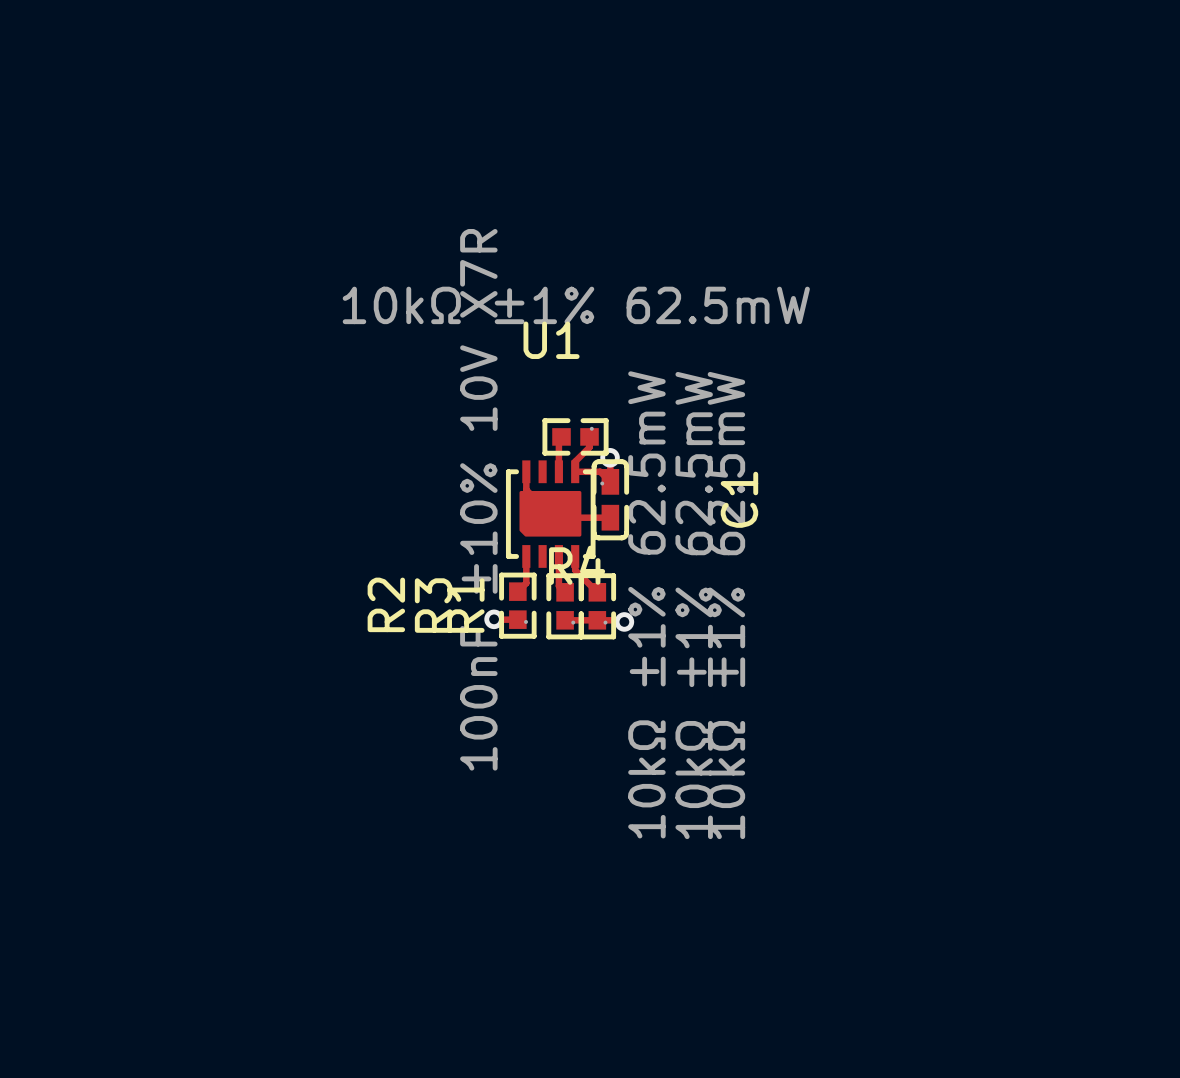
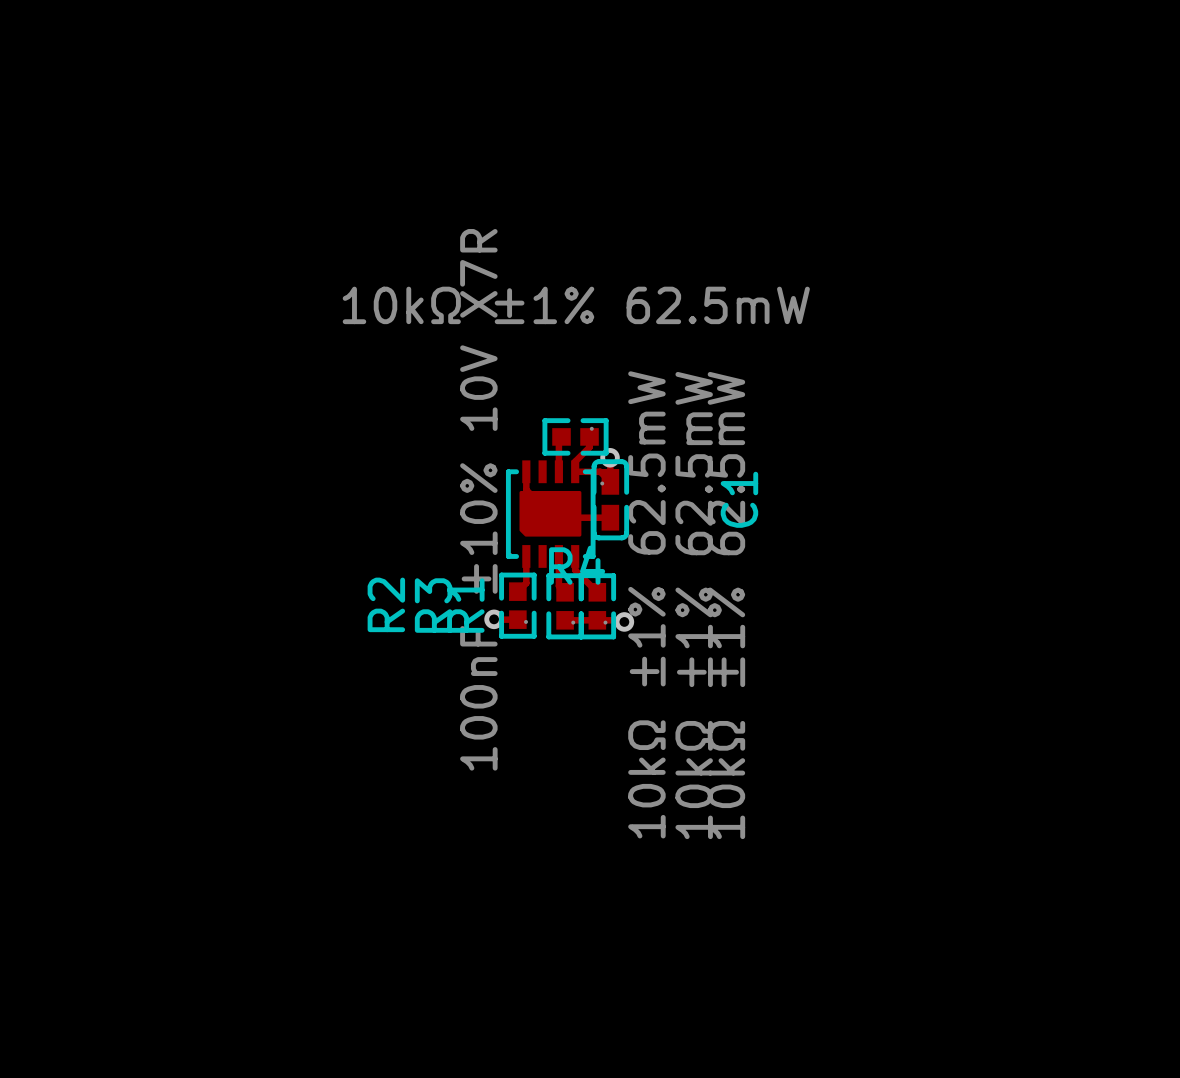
U1 name: U1 (551, 340) -> none

